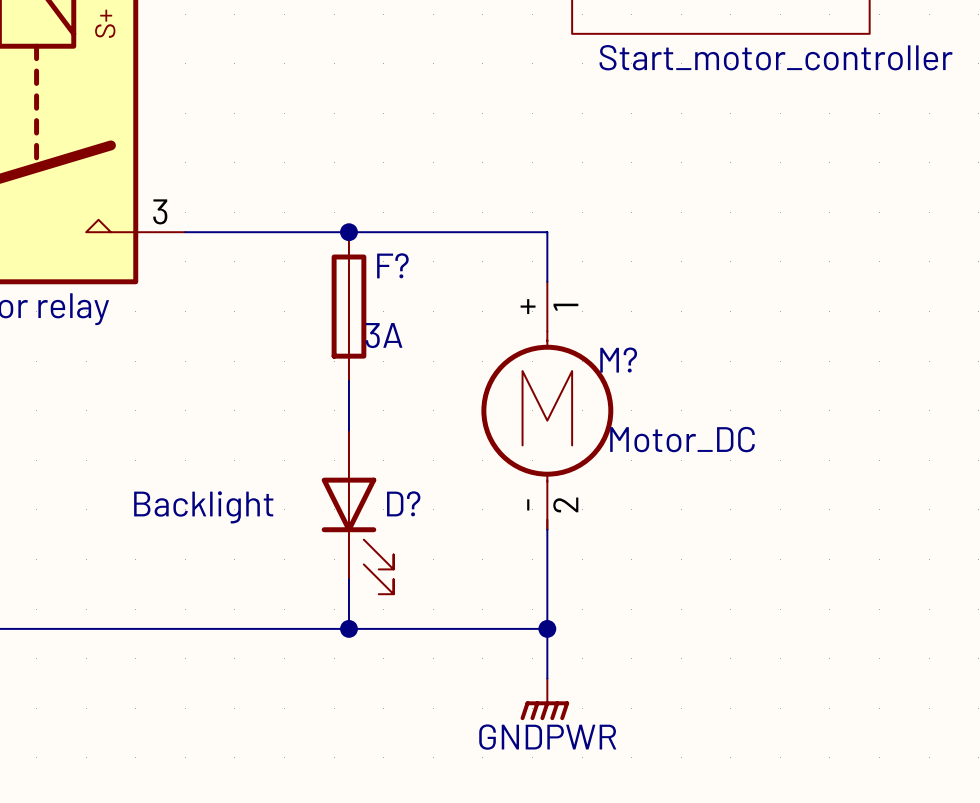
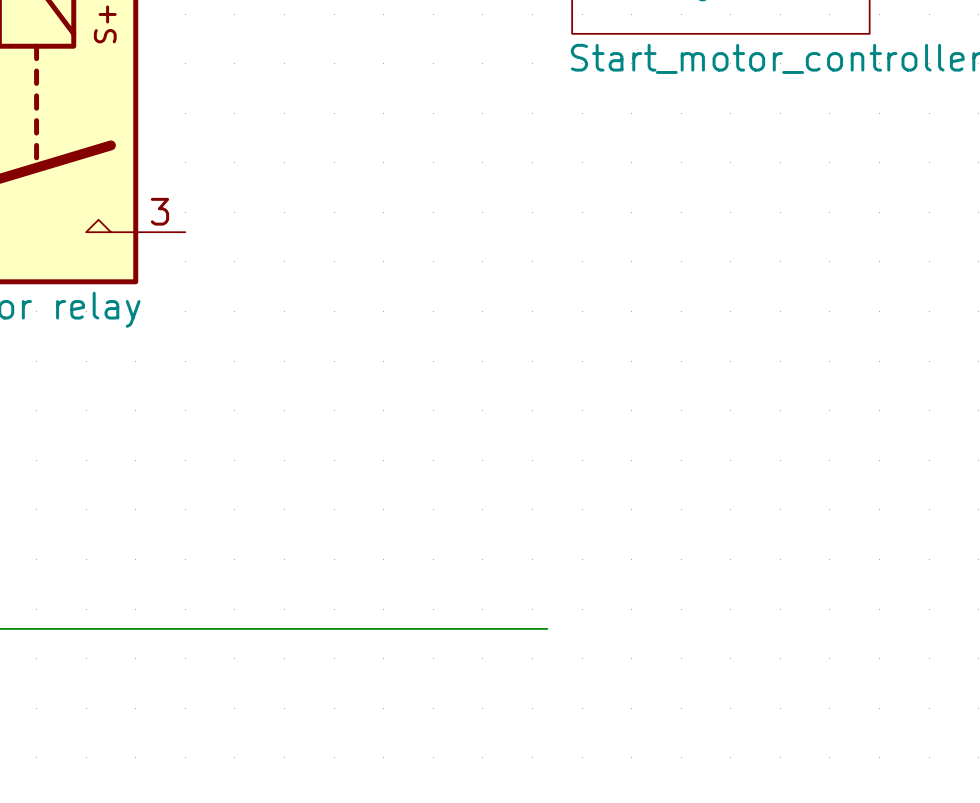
wire: (185, 232) (547, 232) (547, 281) -> none
junction: (348, 232) -> none
F?: 3A (348, 306) -> none
wire: (348, 380) (348, 430) -> none
M?: Motor_DC (547, 405) -> none
D?: Backlight (357, 512) -> none
wire: (547, 529) (547, 678) -> none
wire: (348, 579) (348, 628) -> none
junction: (348, 628) -> none
junction: (547, 628) -> none
power symbol: GNDPWR (544, 699) -> none

